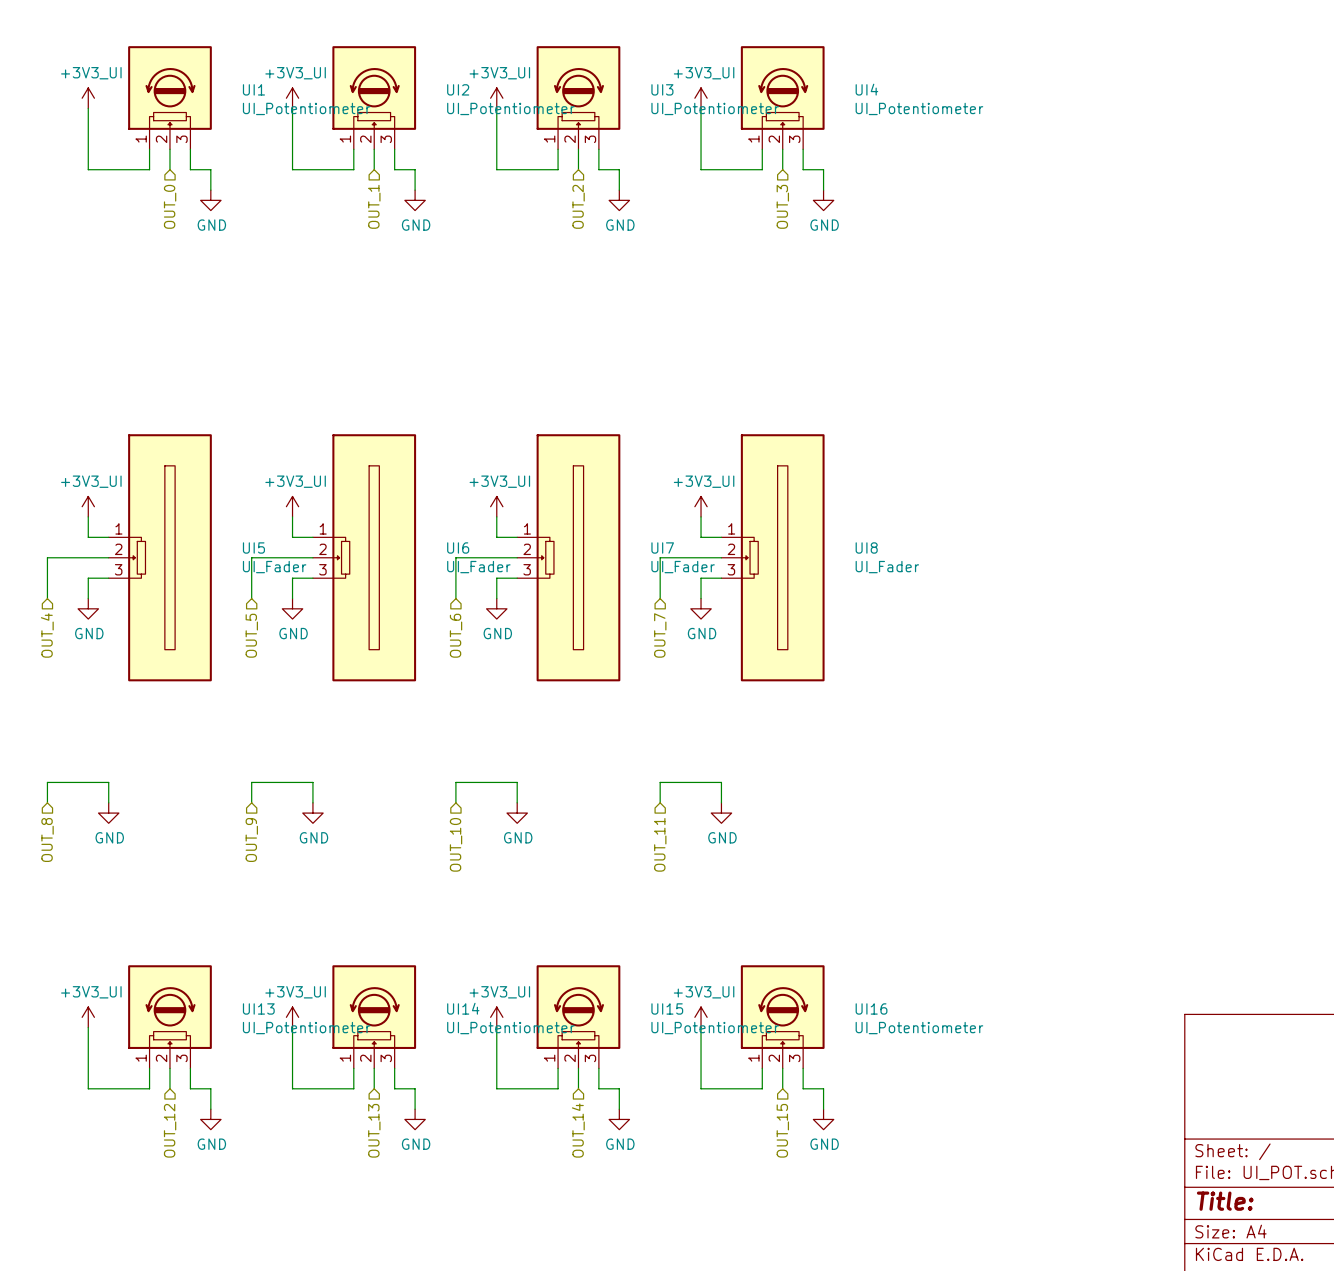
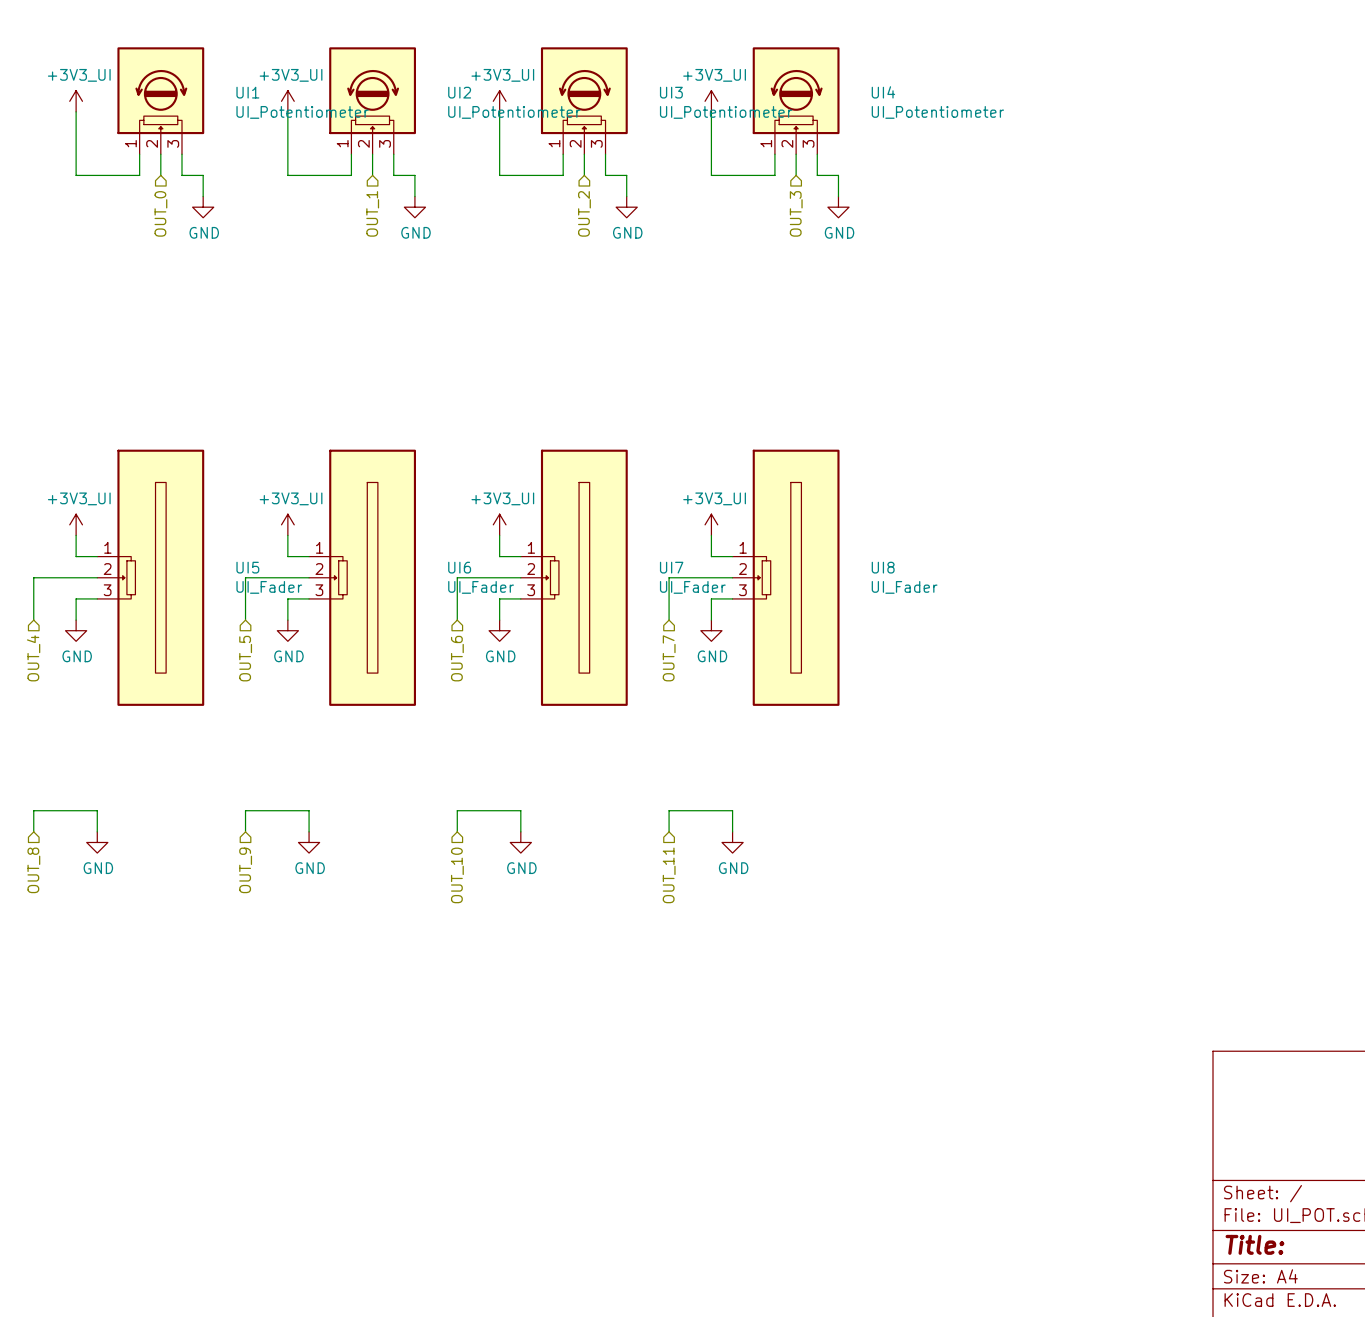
UI13: UI_Potentiometer (169, 1016) -> none
UI14: UI_Potentiometer (374, 1016) -> none
UI15: UI_Potentiometer (578, 1016) -> none
UI16: UI_Potentiometer (782, 1016) -> none
power symbol: +3V3_UI (88, 1017) -> none
power symbol: +3V3_UI (292, 1017) -> none
power symbol: +3V3_UI (496, 1017) -> none
power symbol: +3V3_UI (701, 1017) -> none
wire: (88, 1027) (88, 1088) (149, 1088) (149, 1068) -> none
wire: (292, 1027) (292, 1088) (353, 1088) (353, 1068) -> none
wire: (496, 1027) (496, 1088) (558, 1088) (558, 1068) -> none
wire: (701, 1027) (701, 1088) (762, 1088) (762, 1068) -> none
wire: (169, 1068) (169, 1088) -> none
wire: (190, 1068) (190, 1088) (210, 1088) (210, 1109) -> none
wire: (374, 1068) (374, 1088) -> none
wire: (394, 1068) (394, 1088) (415, 1088) (415, 1109) -> none
wire: (578, 1068) (578, 1088) -> none
wire: (598, 1068) (598, 1088) (619, 1088) (619, 1109) -> none
wire: (782, 1068) (782, 1088) -> none
wire: (803, 1068) (803, 1088) (823, 1088) (823, 1109) -> none
power symbol: GND (210, 1119) -> none
power symbol: GND (415, 1119) -> none
power symbol: GND (619, 1119) -> none
power symbol: GND (823, 1119) -> none
hierarchical label: OUT_12 (170, 1130) -> none
hierarchical label: OUT_13 (374, 1130) -> none
hierarchical label: OUT_14 (578, 1130) -> none
hierarchical label: OUT_15 (782, 1130) -> none

